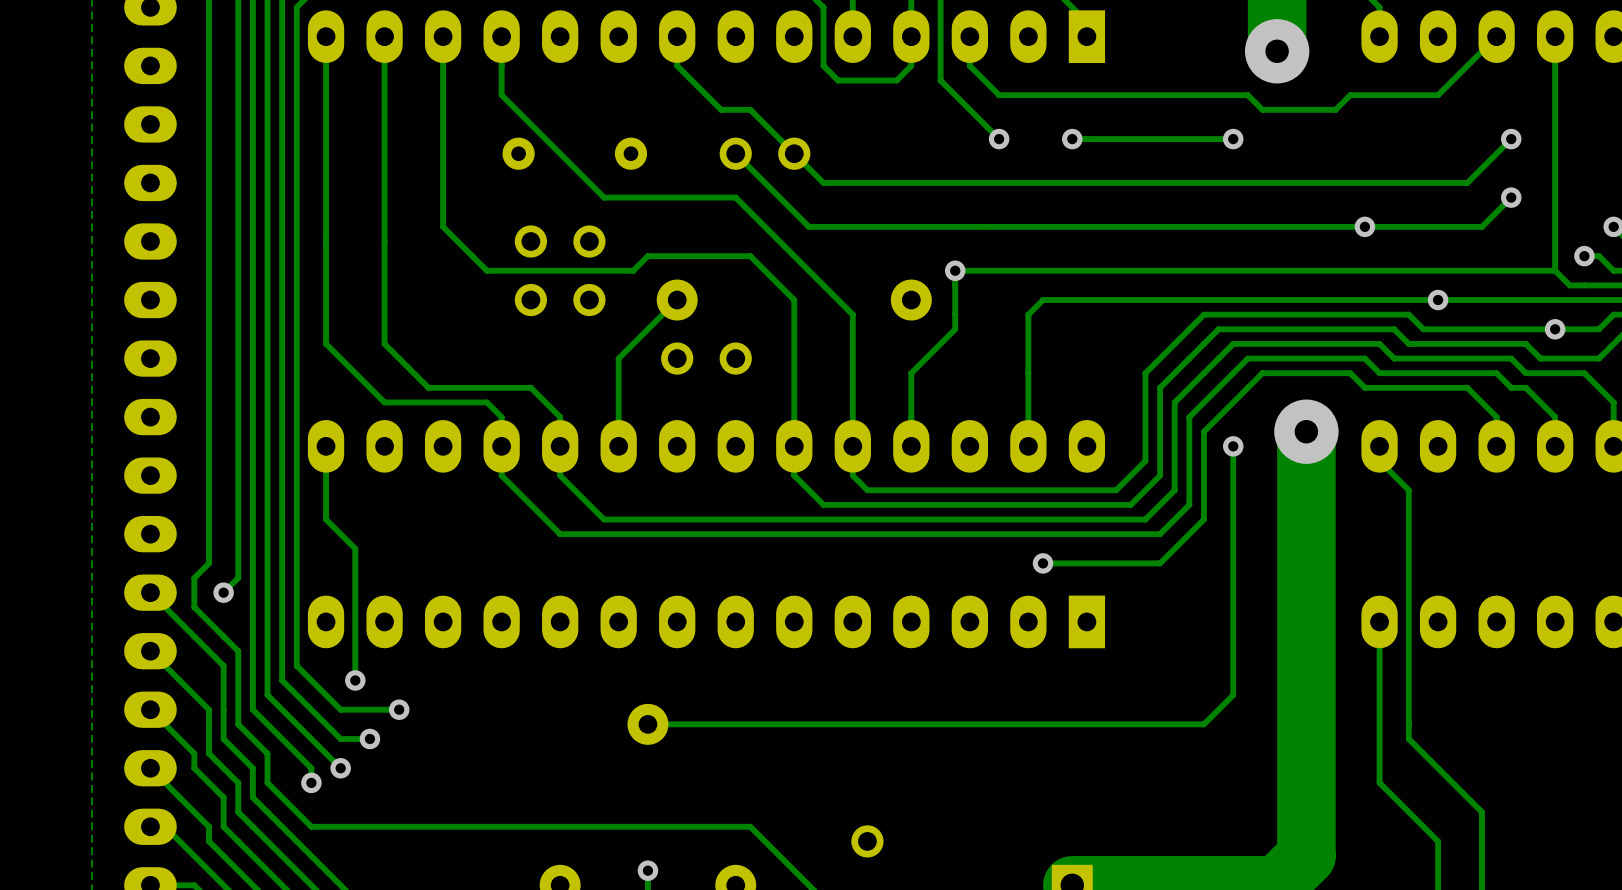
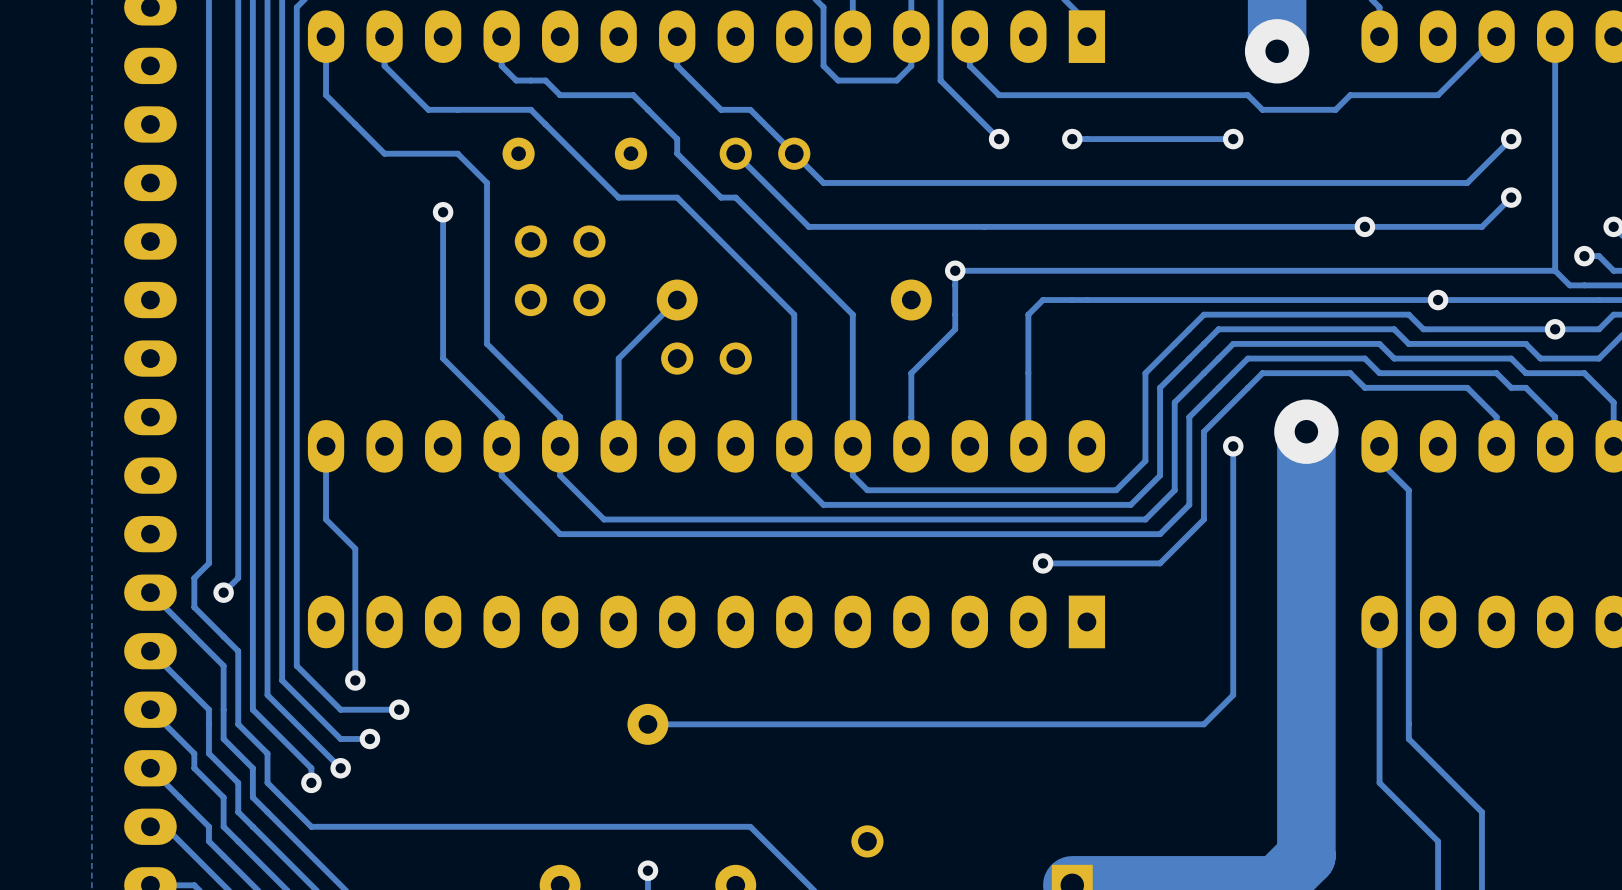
track: (443, 36) (443, 212) -> none
track: (384, 65) (384, 343) (428, 387) (530, 387) -> (384, 65) (428, 109) (530, 109) (618, 197)
track: (501, 65) (501, 95) (604, 197) (618, 197) -> (501, 65) (516, 80) (545, 80) (560, 95) (633, 95) (677, 139) (677, 153) (721, 197)
track: (326, 95) (326, 343) (384, 402) (487, 402) -> (326, 95) (384, 153) (457, 153) (487, 182) (487, 343) (530, 387)
track: (721, 197) (677, 197) -> (794, 314) (677, 197)
via: none -> (443, 212)
track: (443, 226) (487, 270) (633, 270) (647, 256) (750, 256) (794, 300) (794, 314) -> (443, 226) (443, 358) (487, 402)

